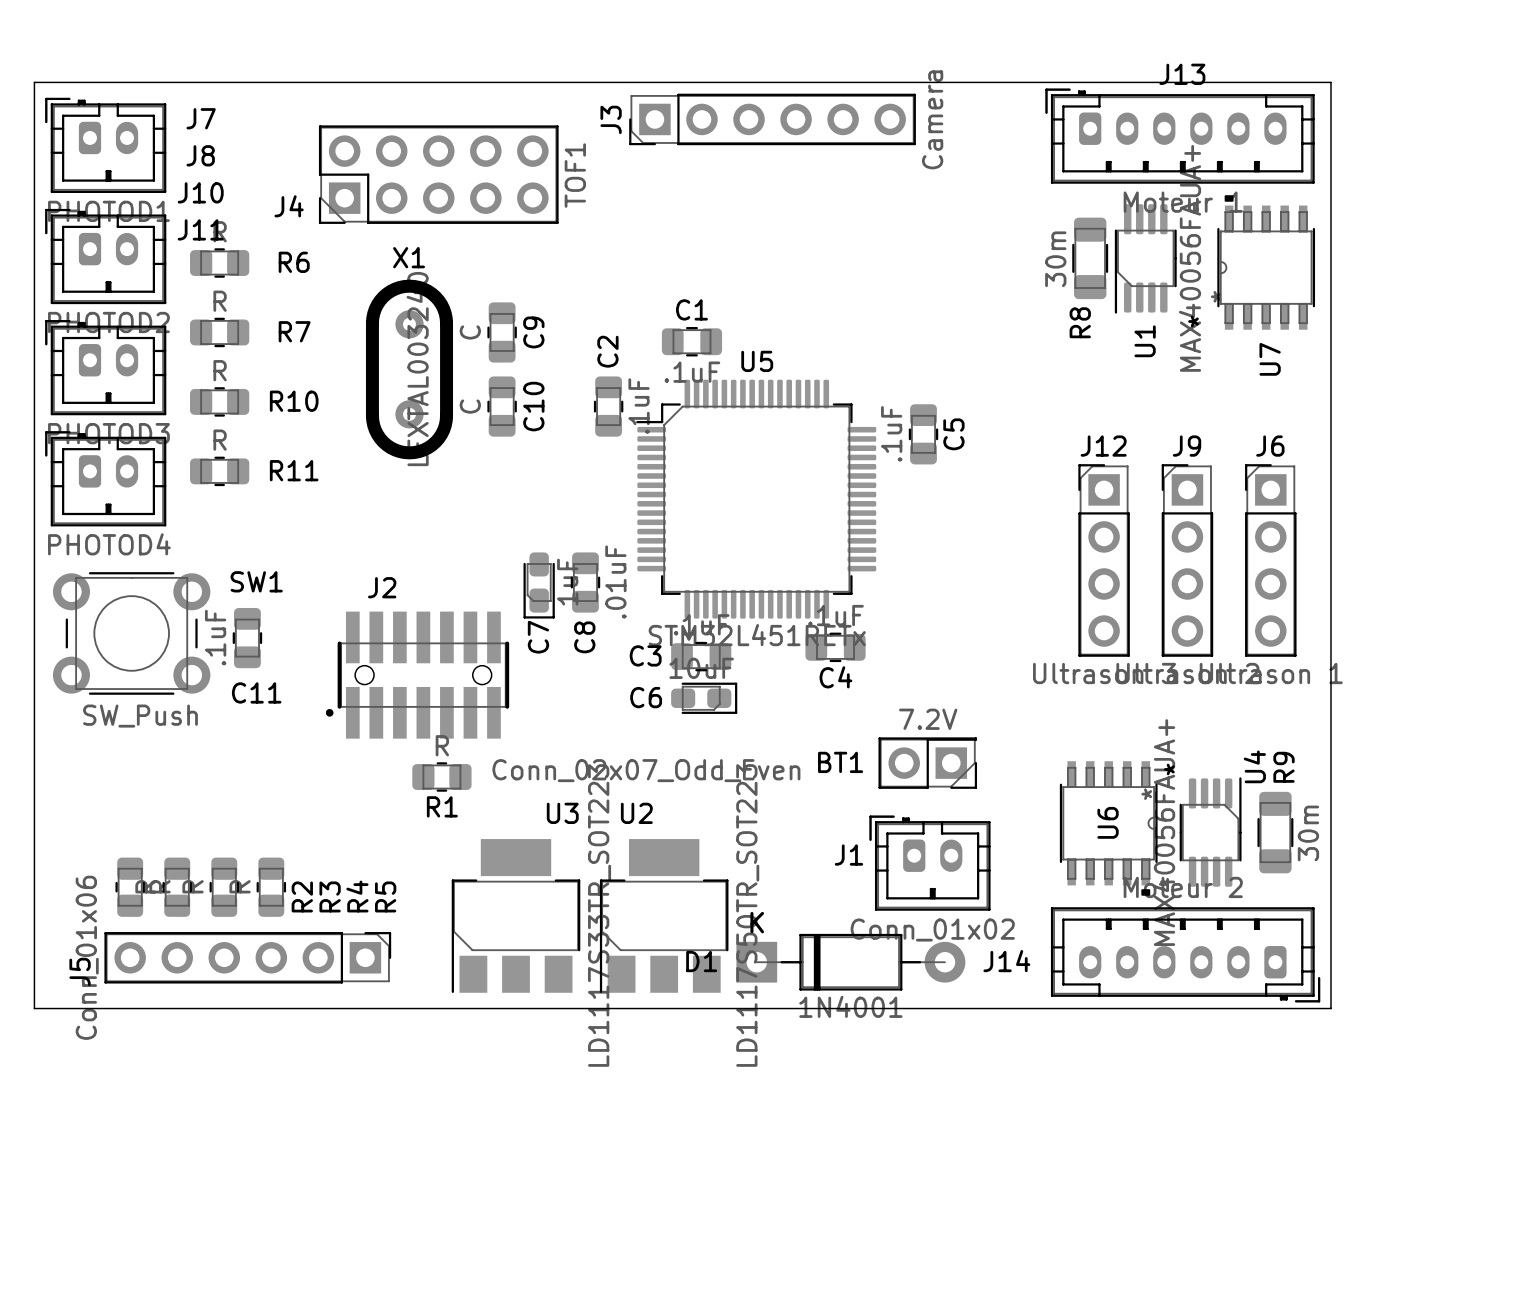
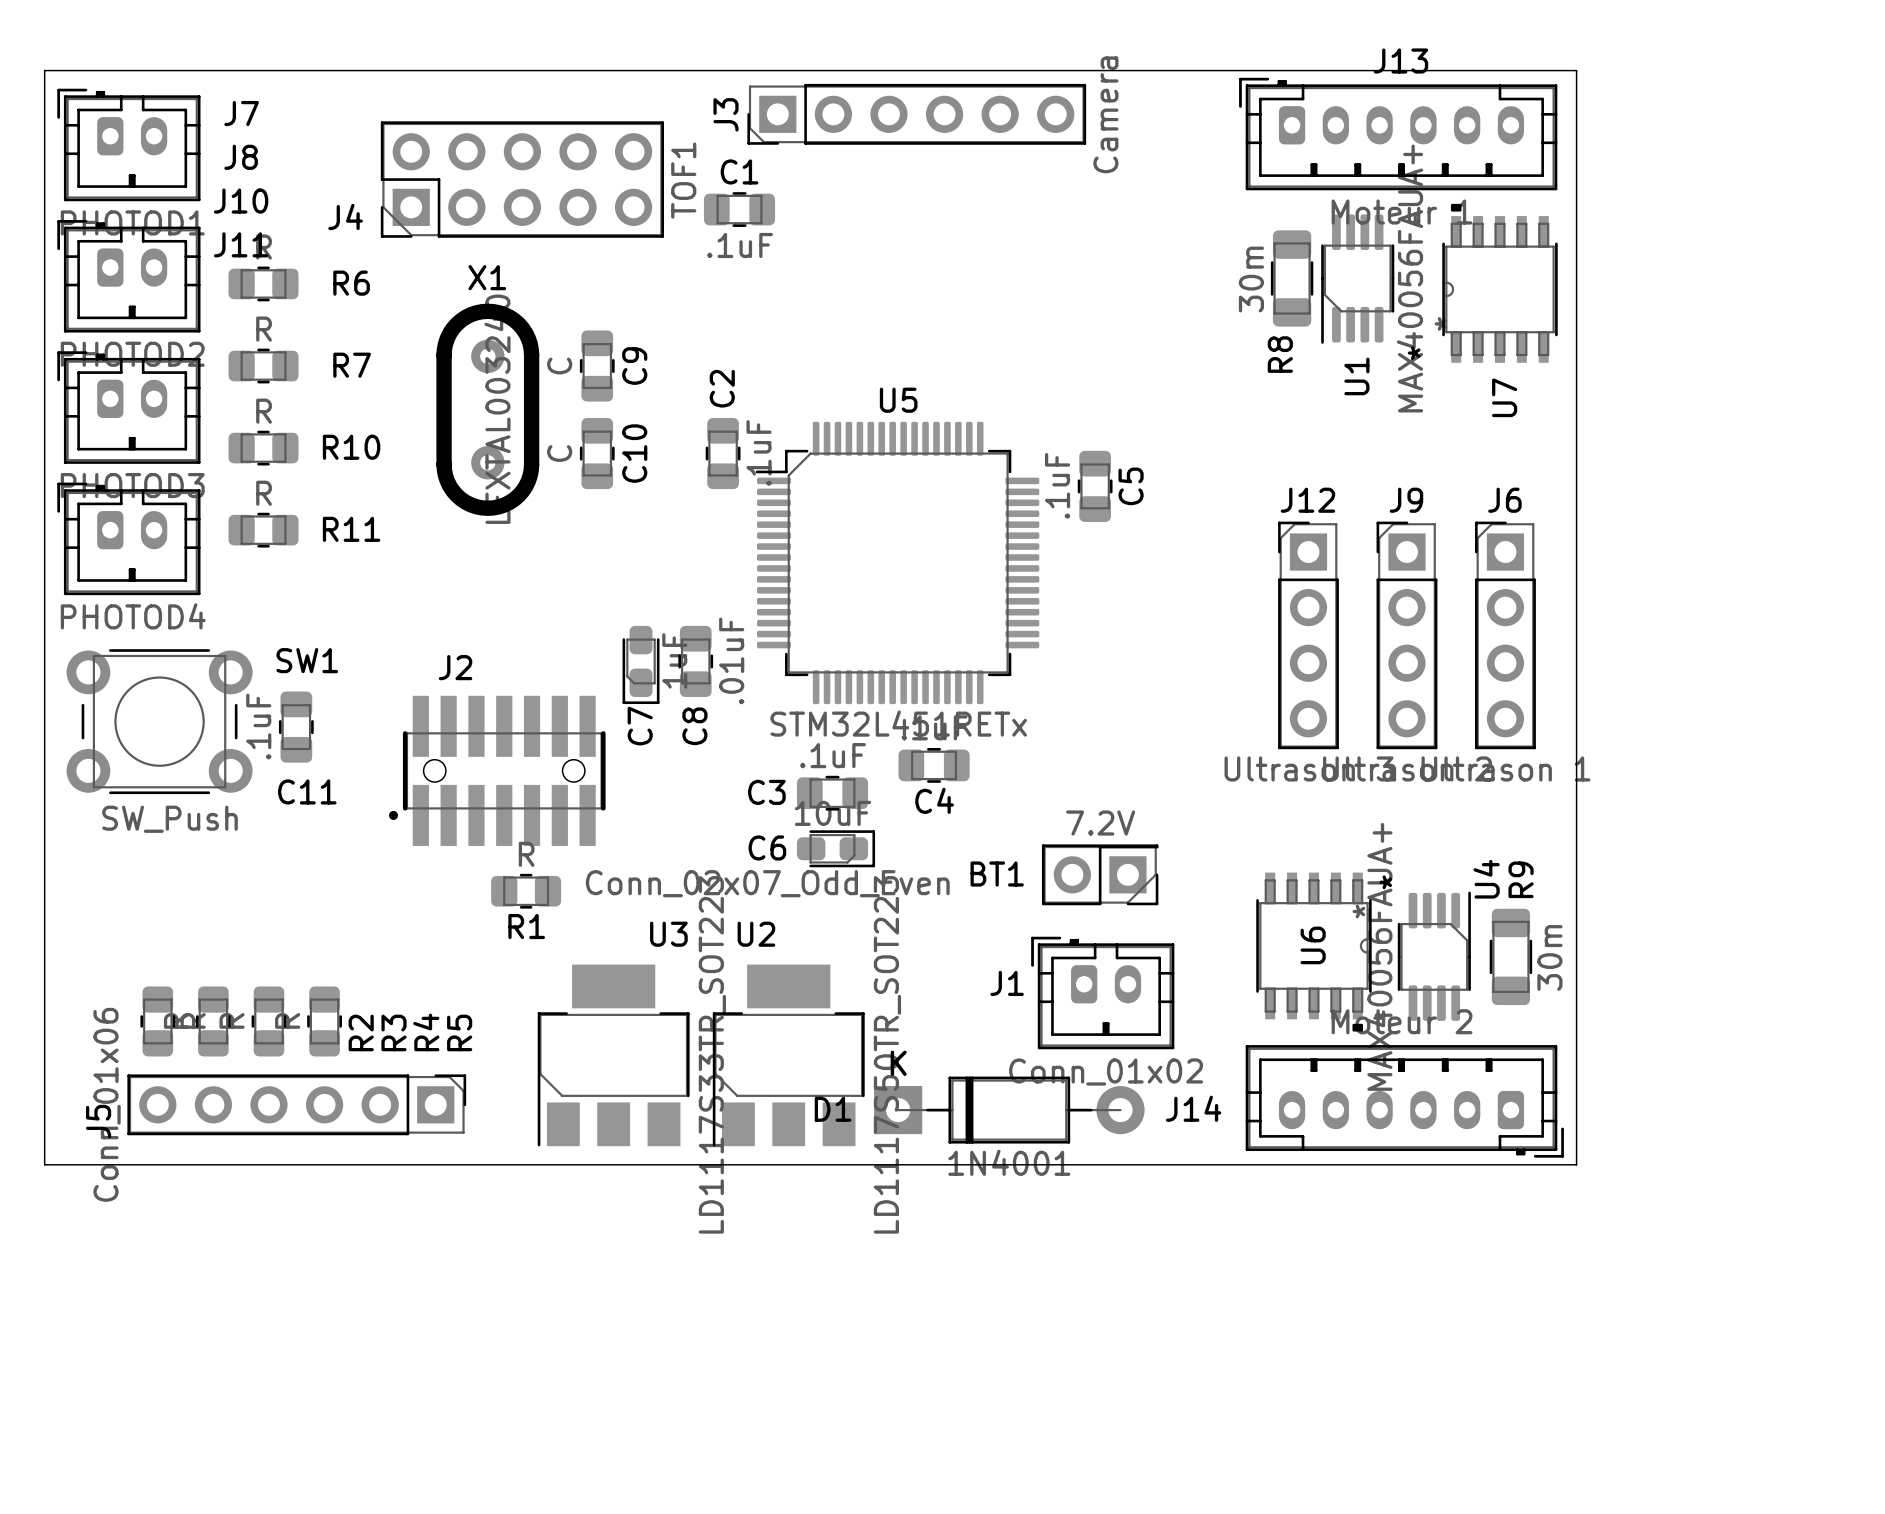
C1 position: (691, 341) -> (739, 209)
C4 position: (835, 647) -> (934, 765)
C3 position: (701, 656) -> (832, 793)
C6 position: (704, 698) -> (836, 848)

